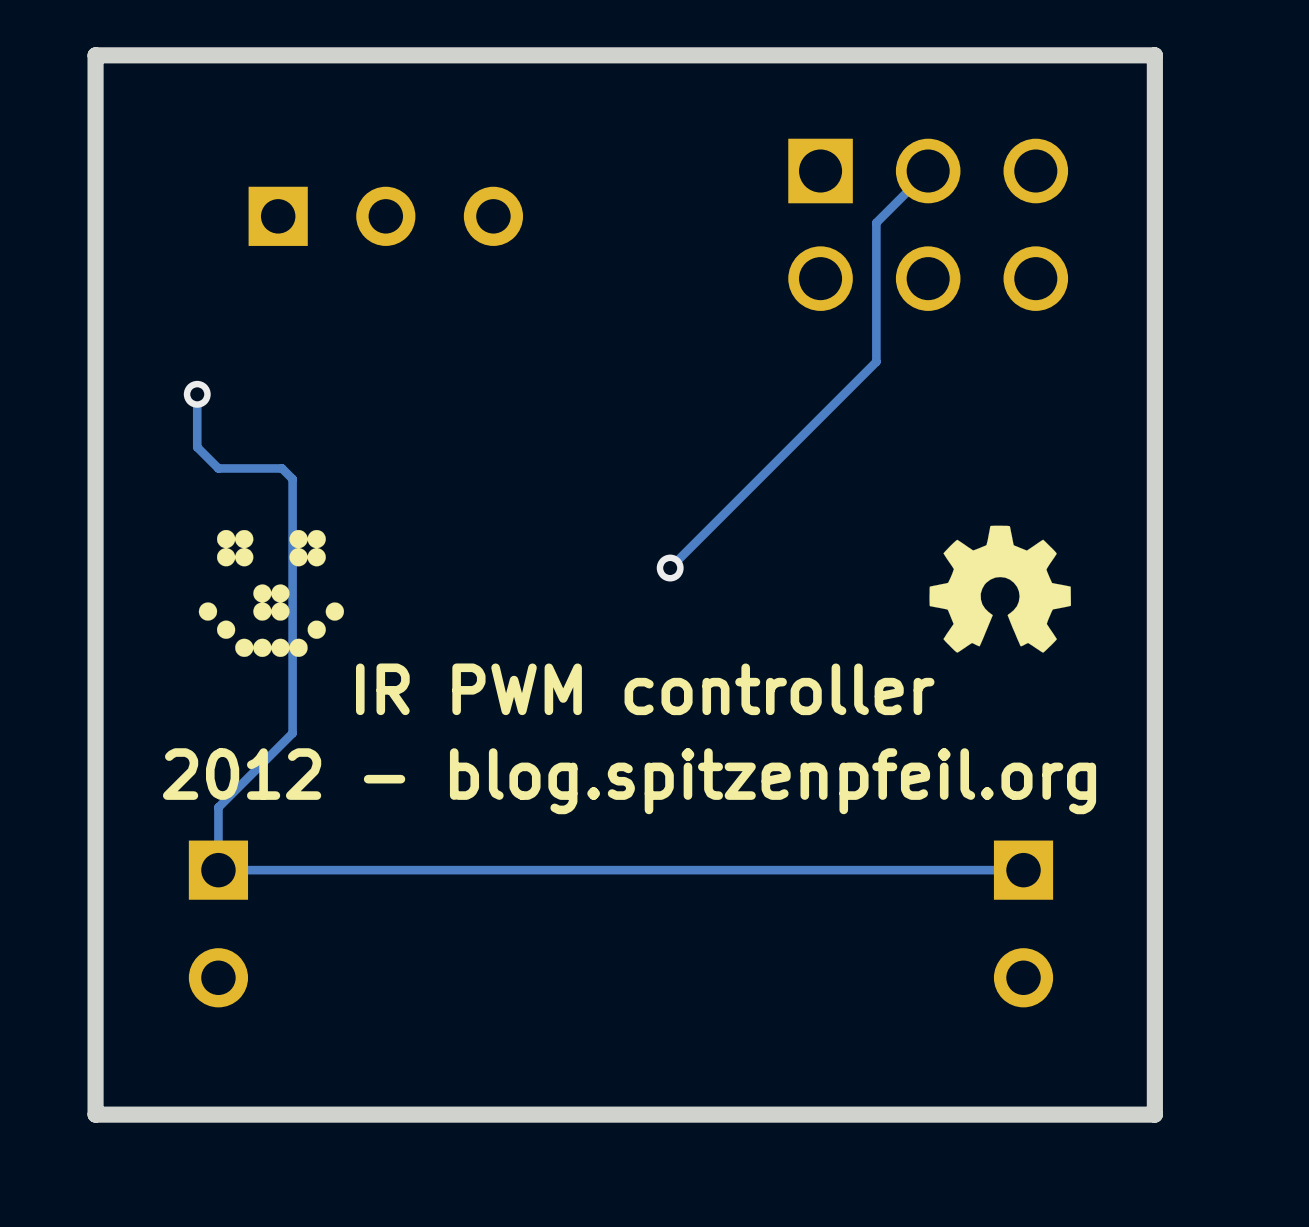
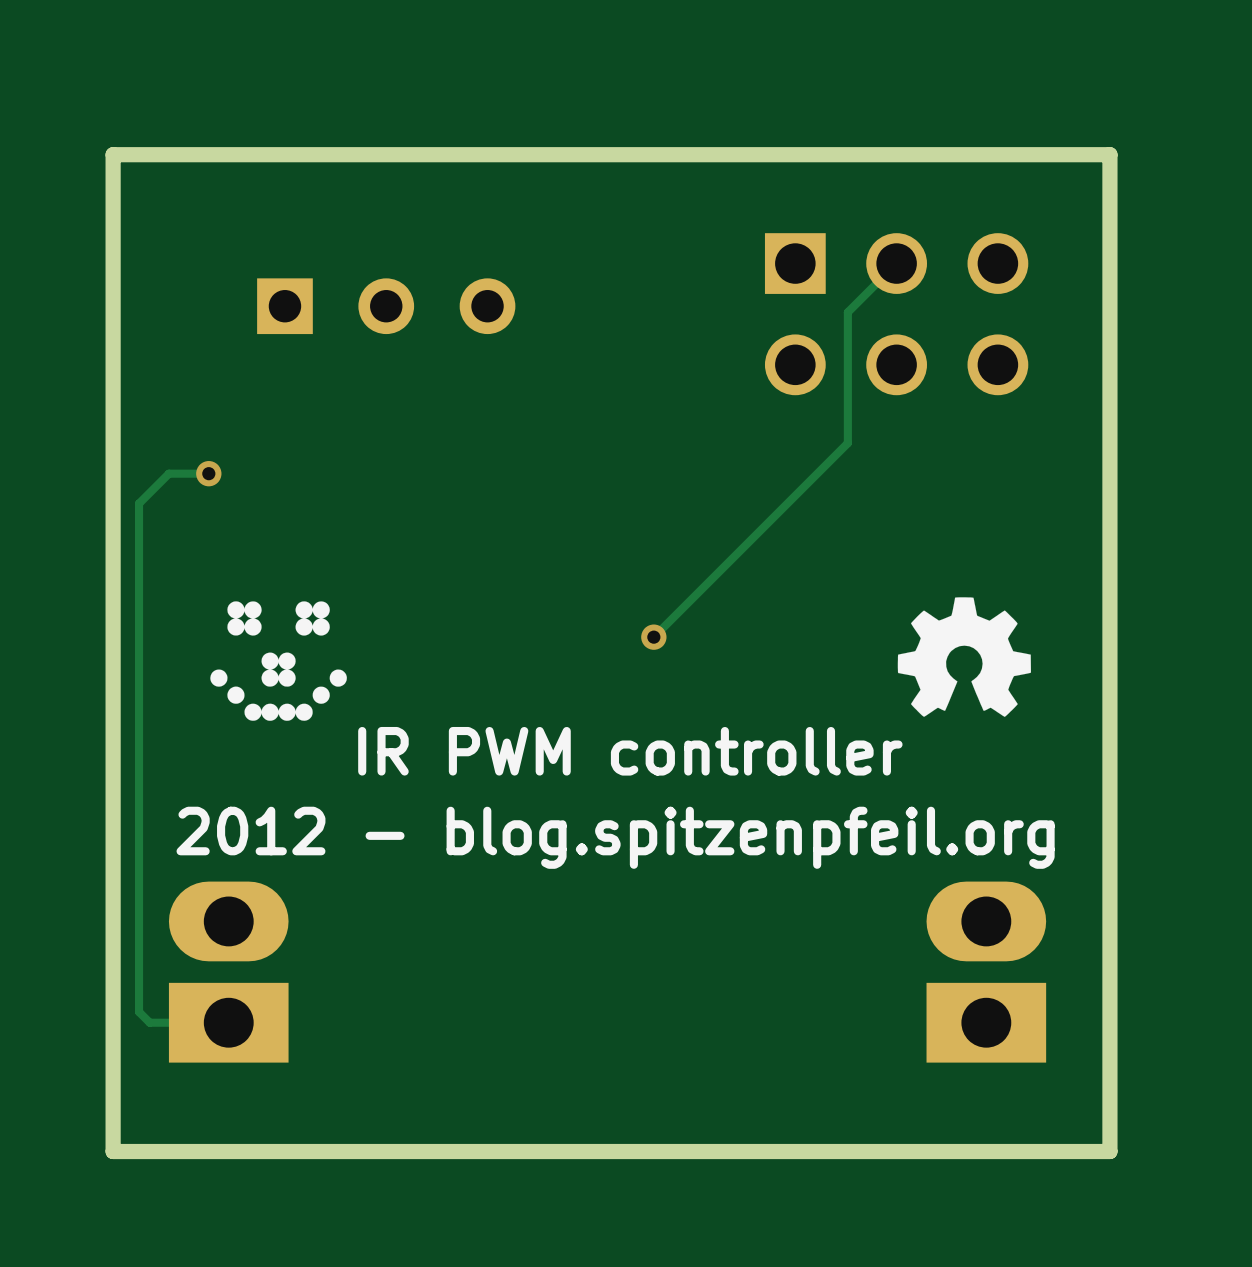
track: (197, 394) (197, 447) (218, 468) (282, 468) (292, 479) (292, 733) (218, 807) (218, 870) (1023, 870) -> (208, 473) (168, 473) (139, 503) (139, 1011) (149, 1022) (228, 1022)
part footprint: [188, 840, 249, 1008] -> [168, 881, 289, 1063]
part footprint: [993, 840, 1054, 1008] -> [926, 881, 1047, 1063]

